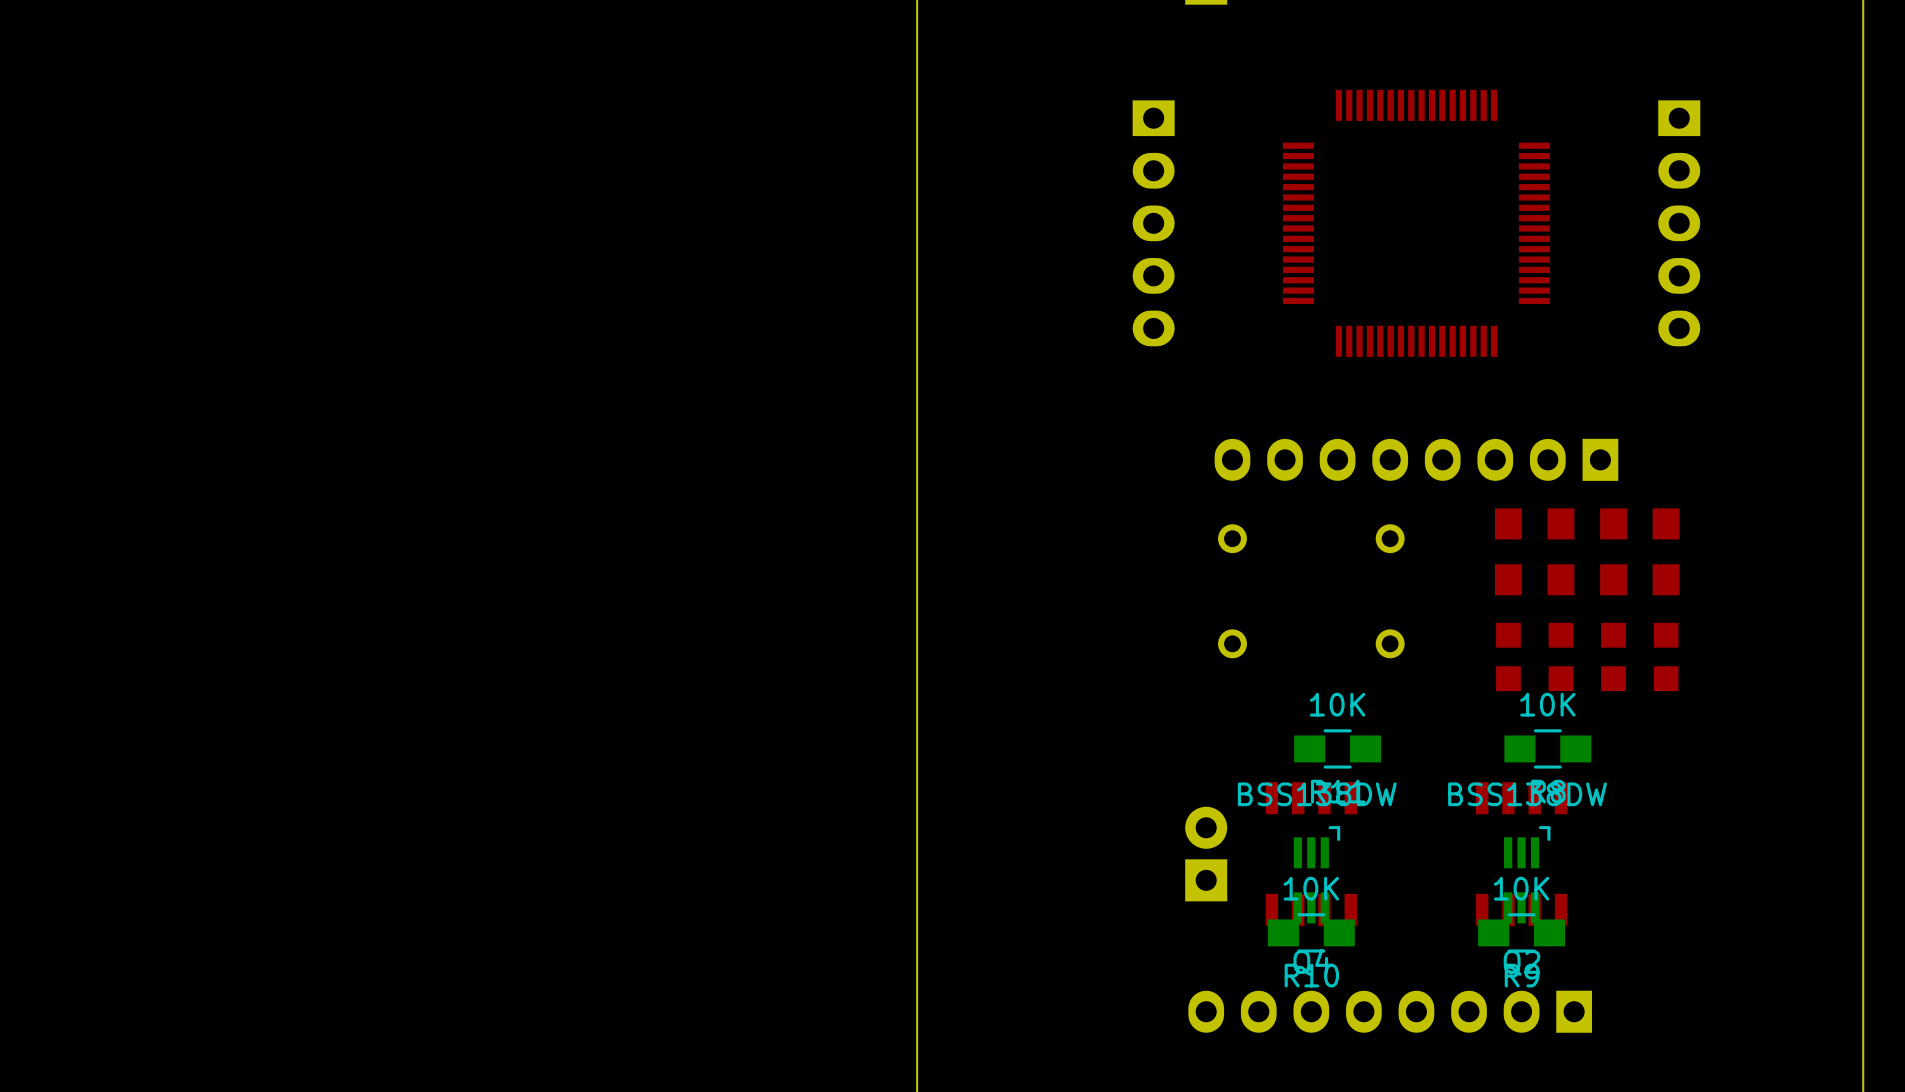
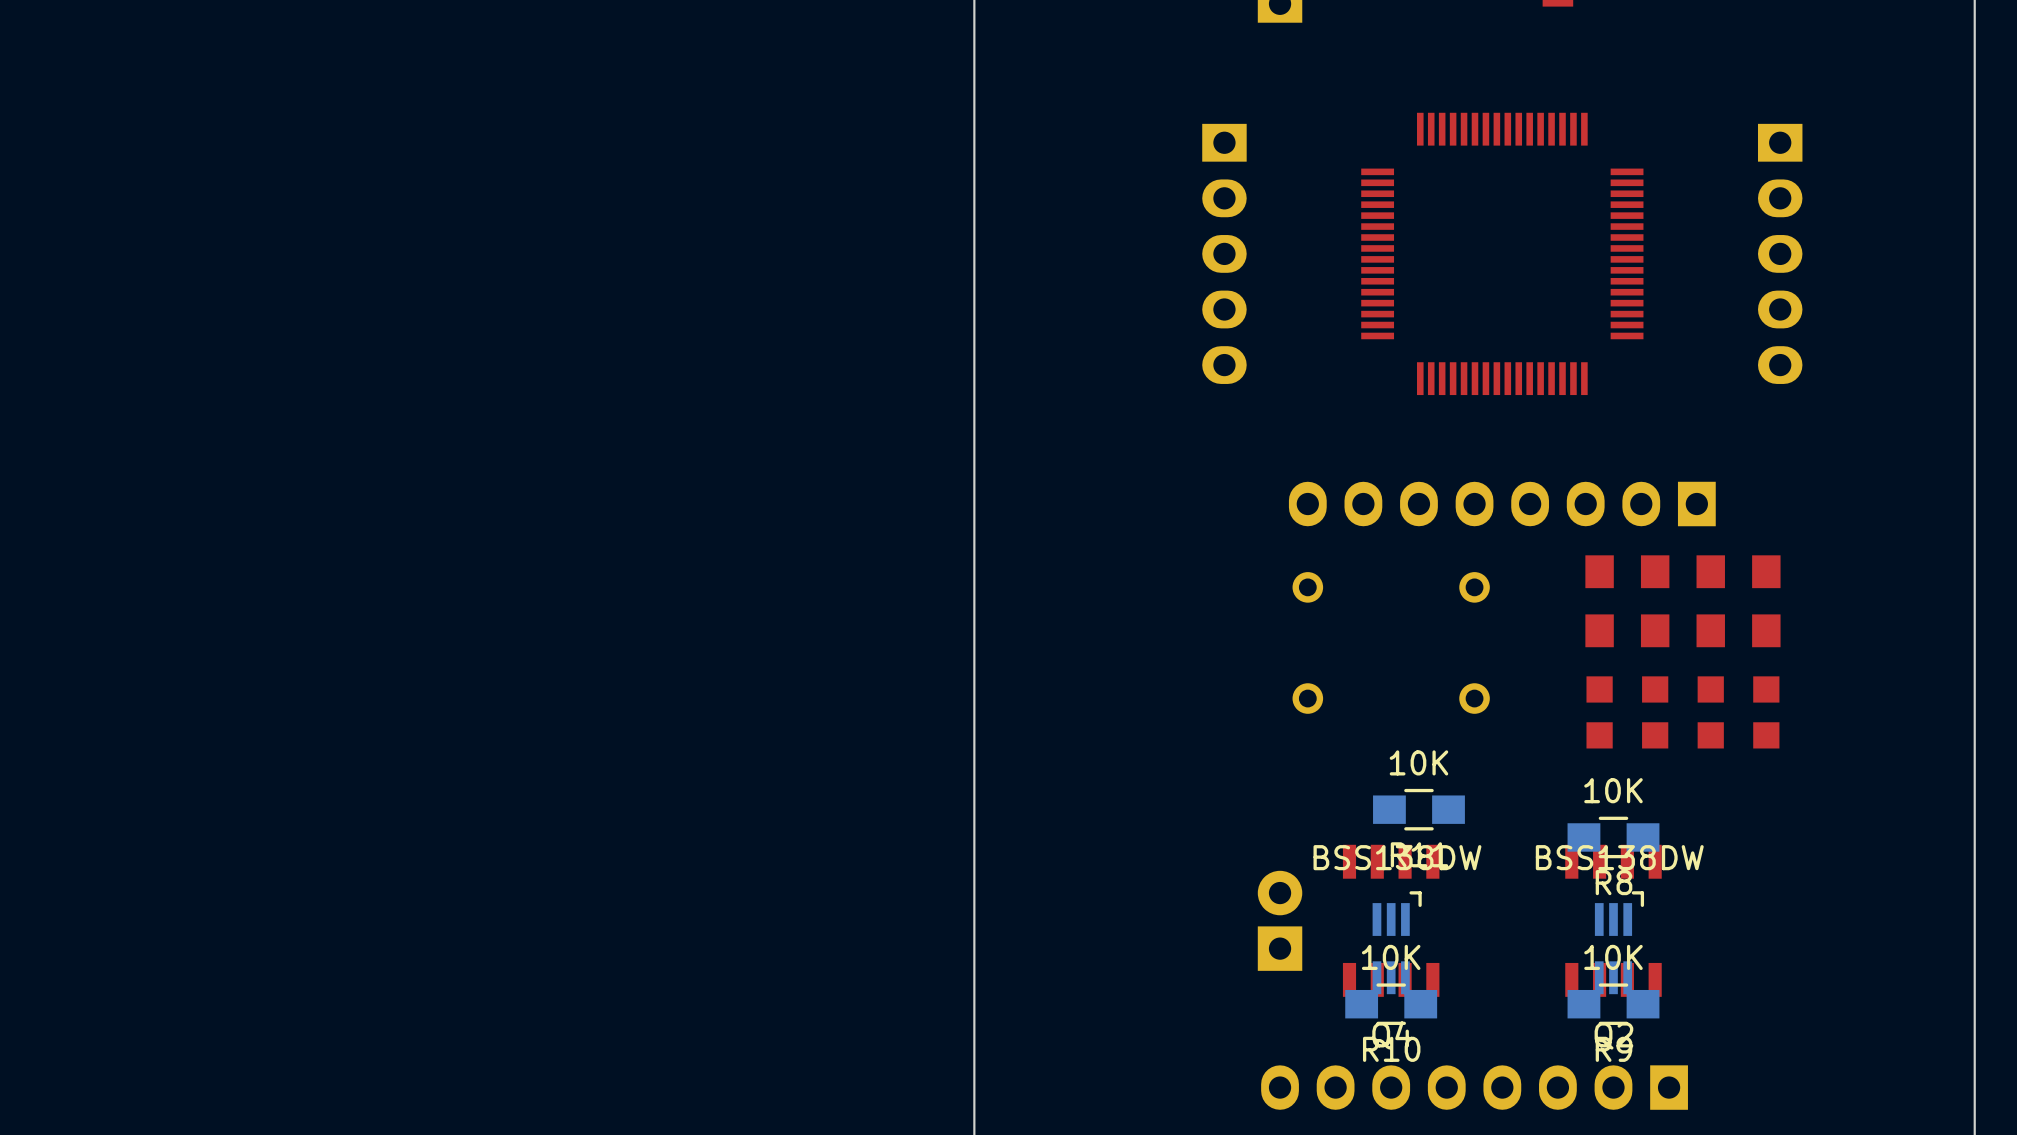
R8 position: (1547, 748) -> (1613, 837)

